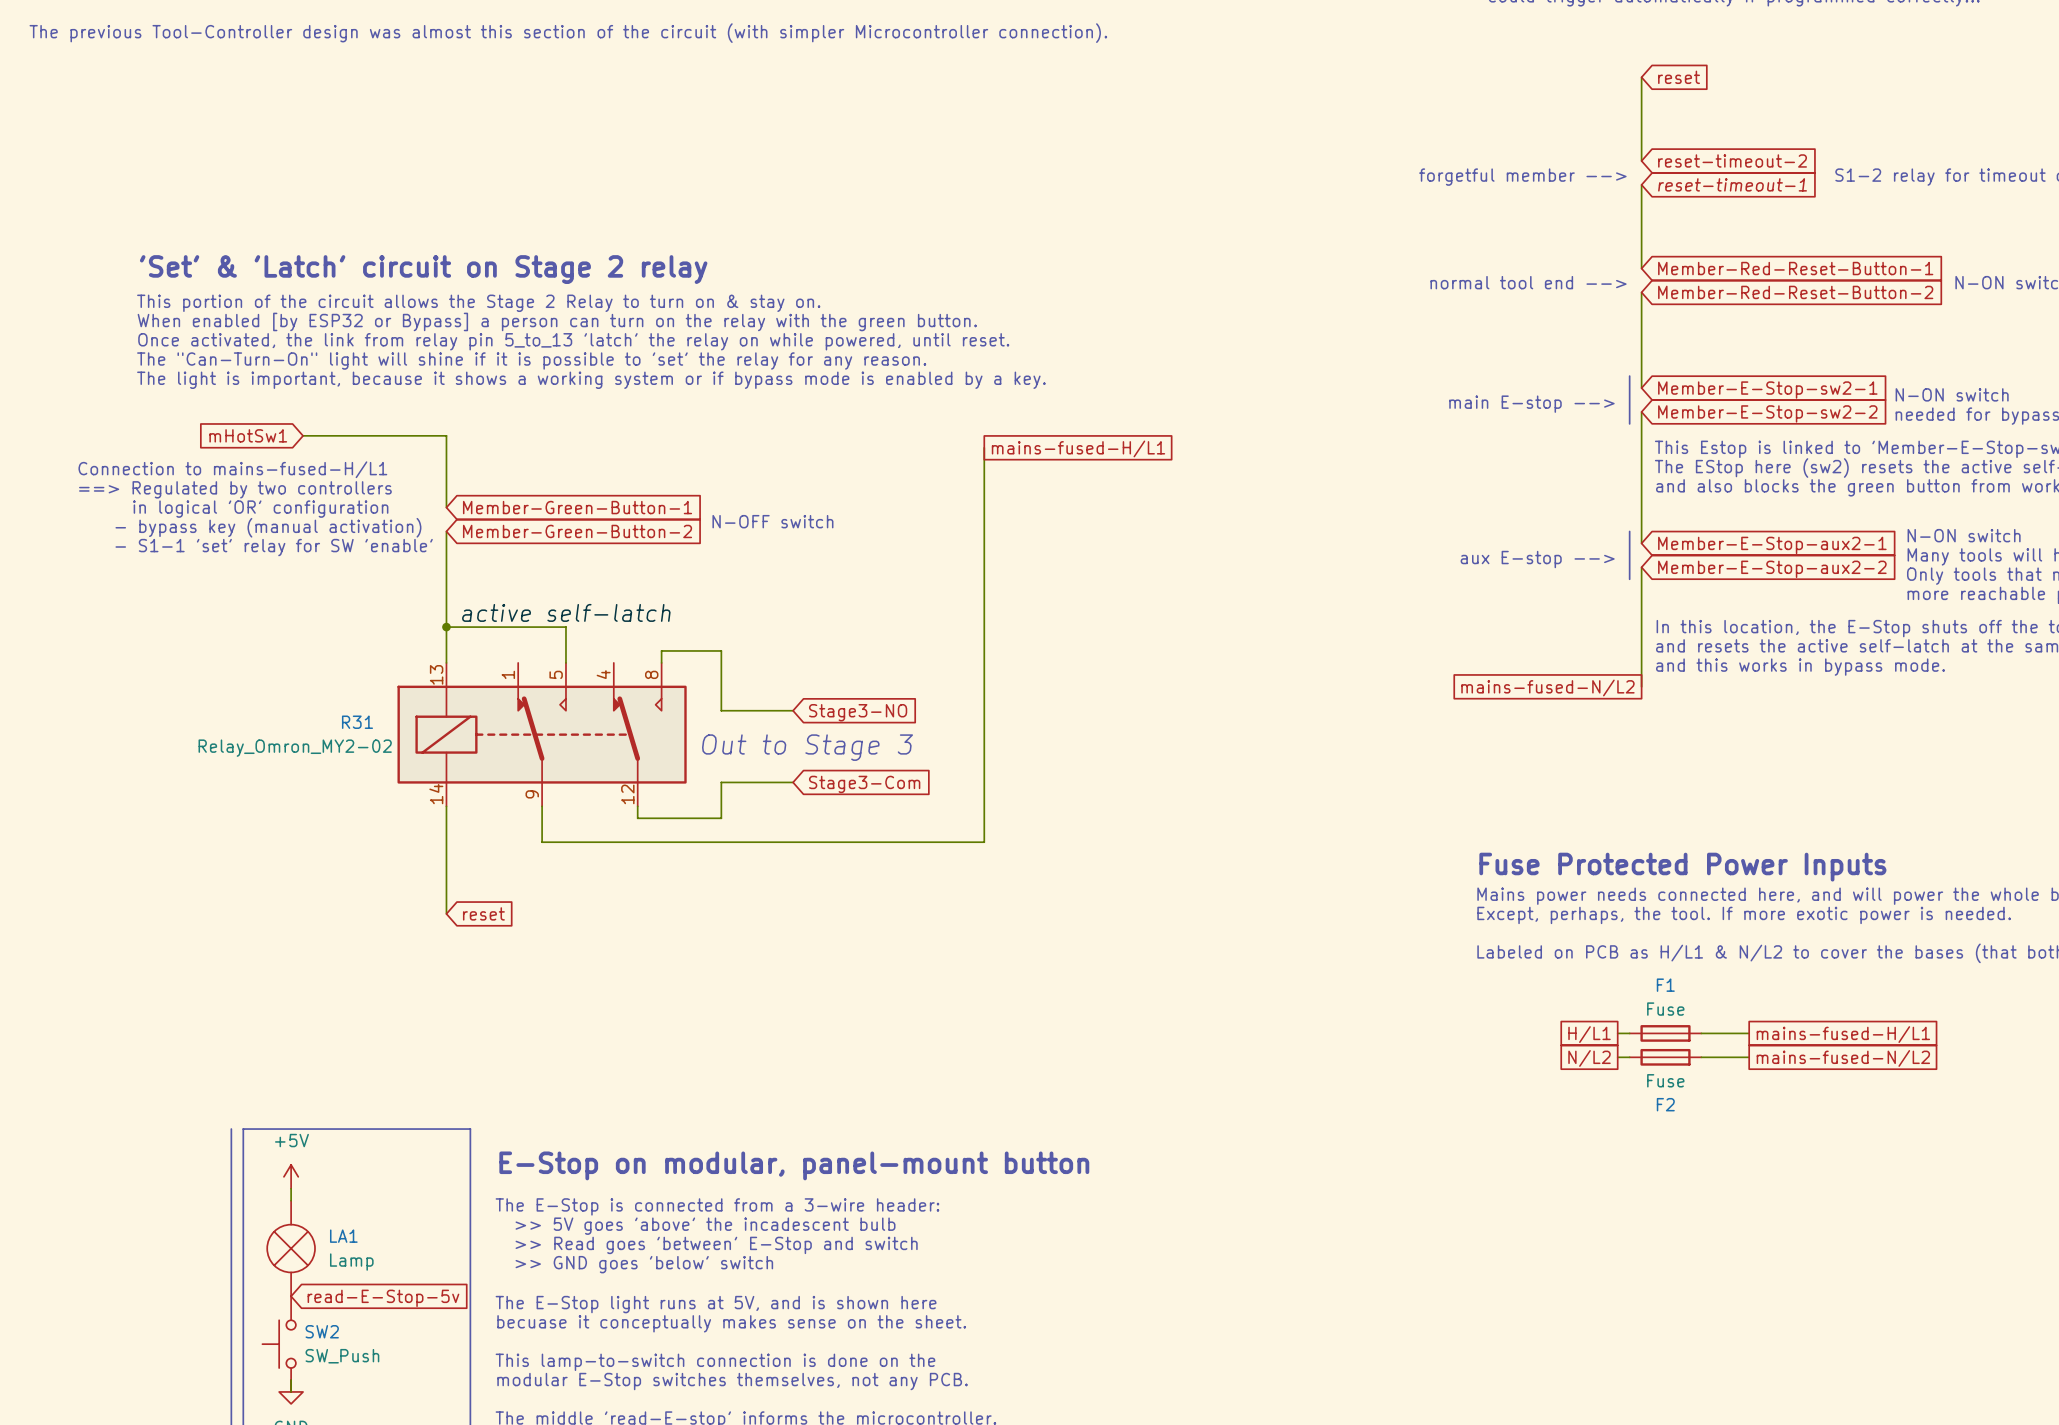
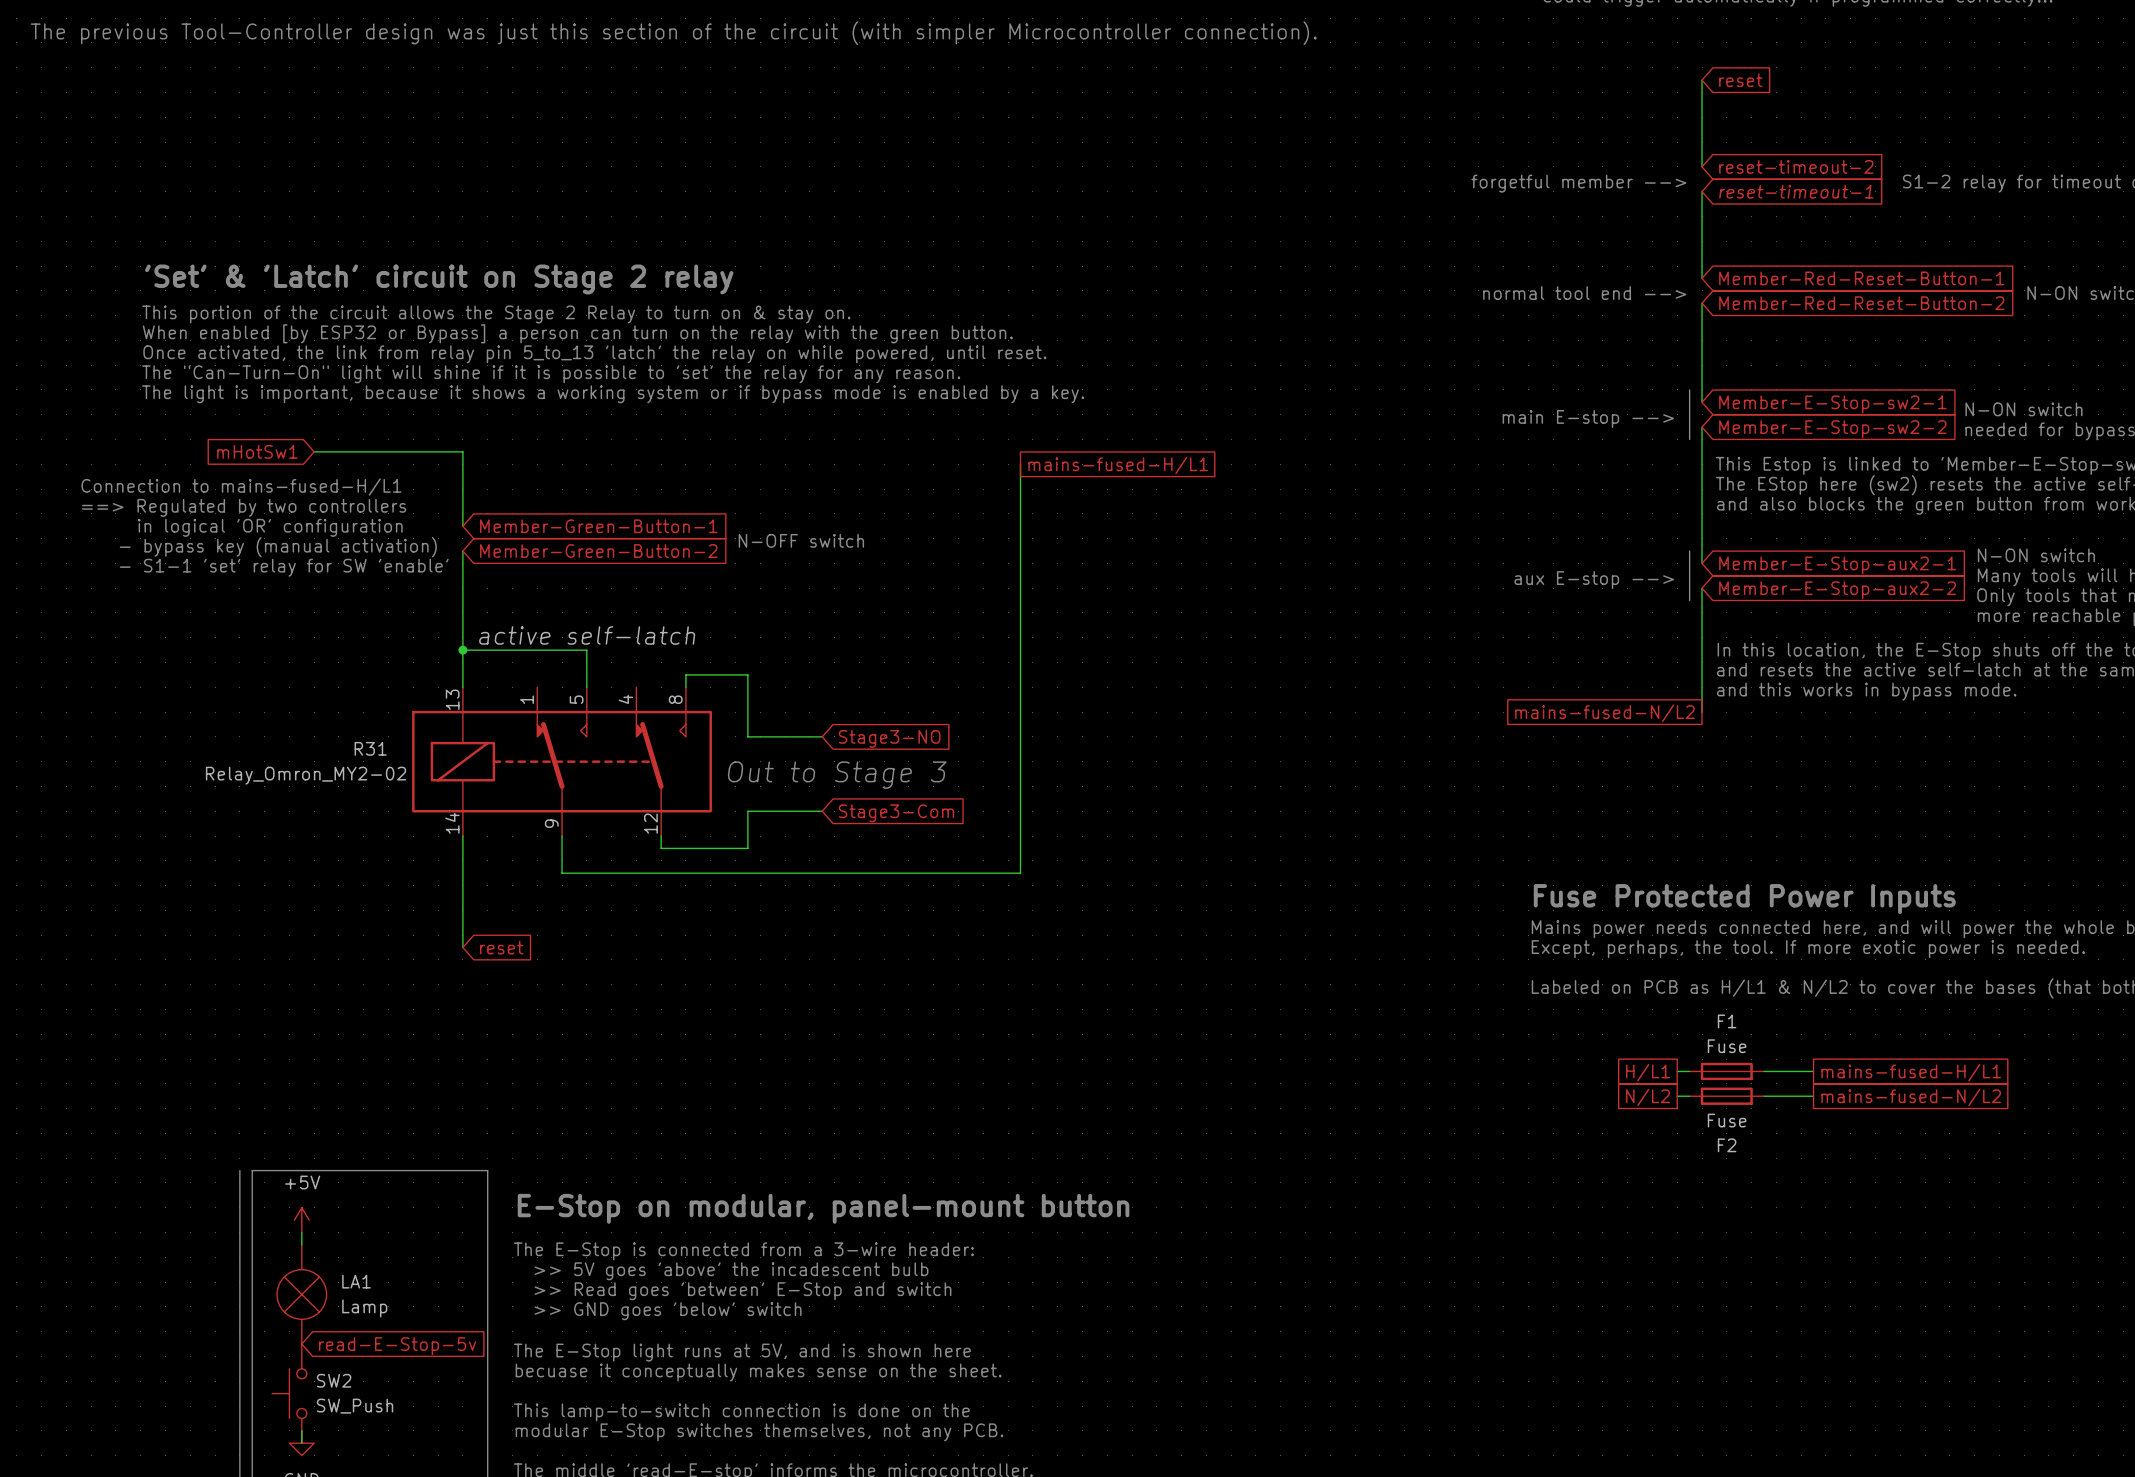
text: The previous Tool-Controller design was almost this section of the circuit (with simpler Microcontroller connection). (568, 33) -> The previous Tool-Controller design was just this section of the circuit (with simpler Microcontroller connection). (673, 33)

